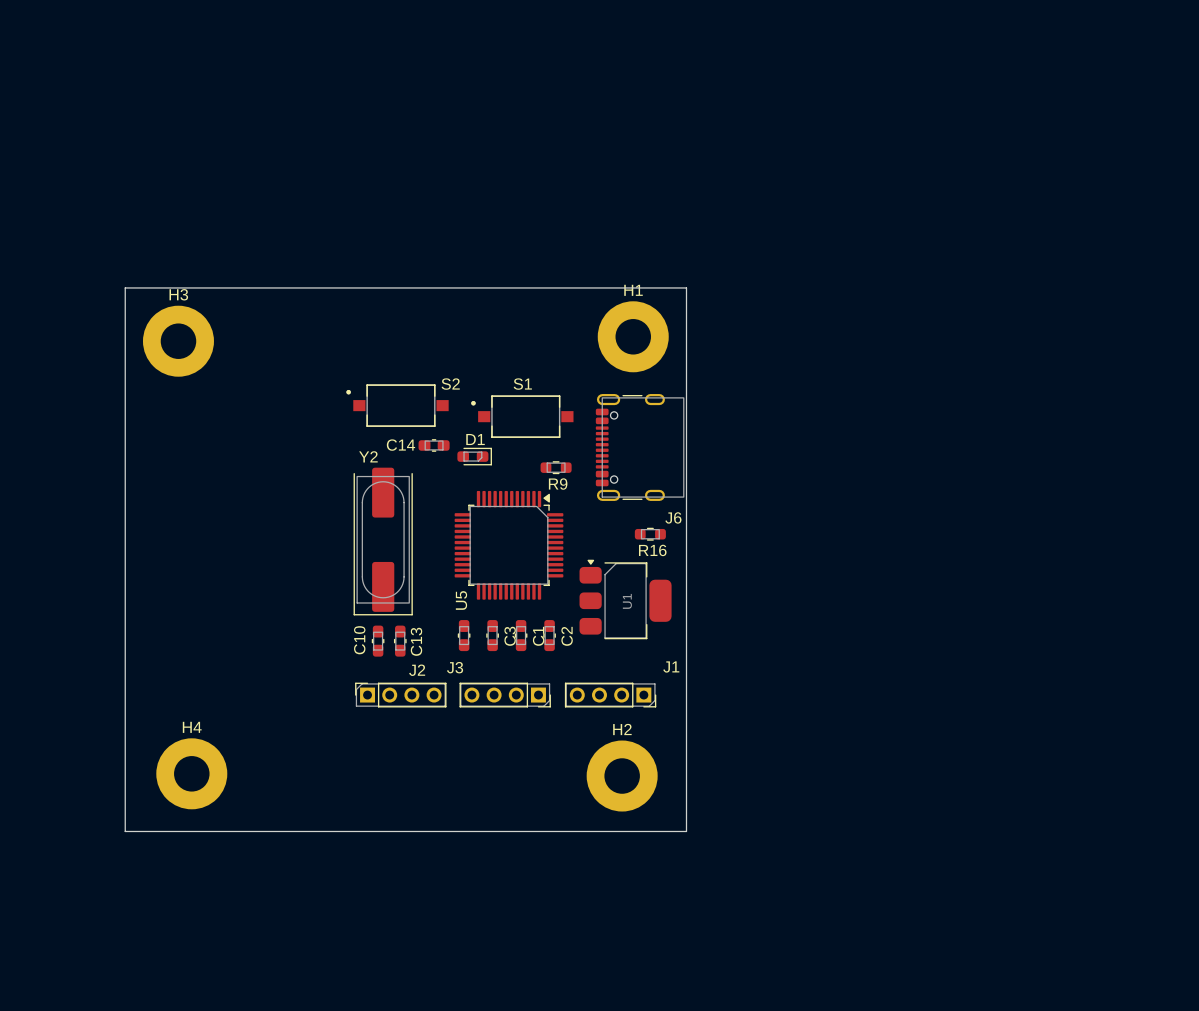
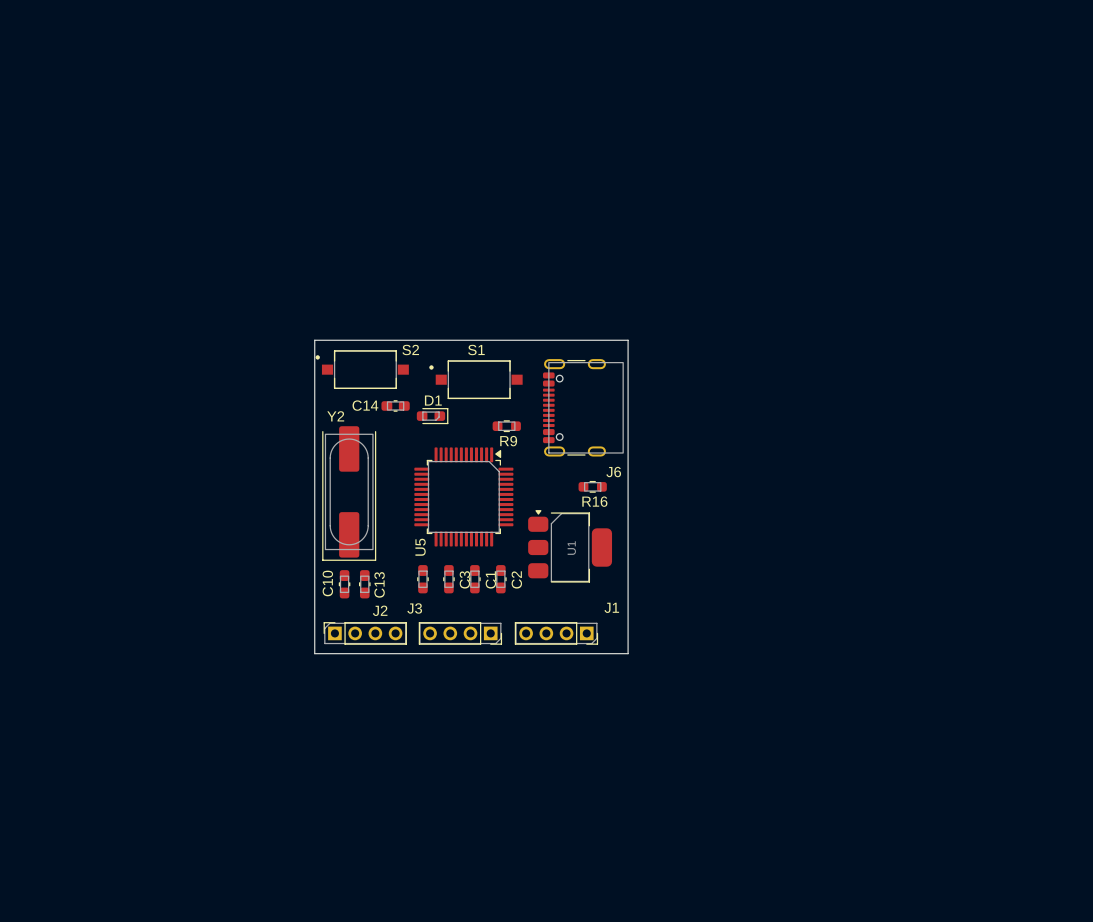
board edge: (125, 287) (686, 287) (686, 831) (125, 831) (125, 287) -> none
H1: (633, 336) -> none
H3: (178, 341) -> none
board edge: none -> (314, 340) (628, 340) (628, 653) (314, 653) (314, 340)
H4: (191, 773) -> none
H2: (622, 776) -> none

